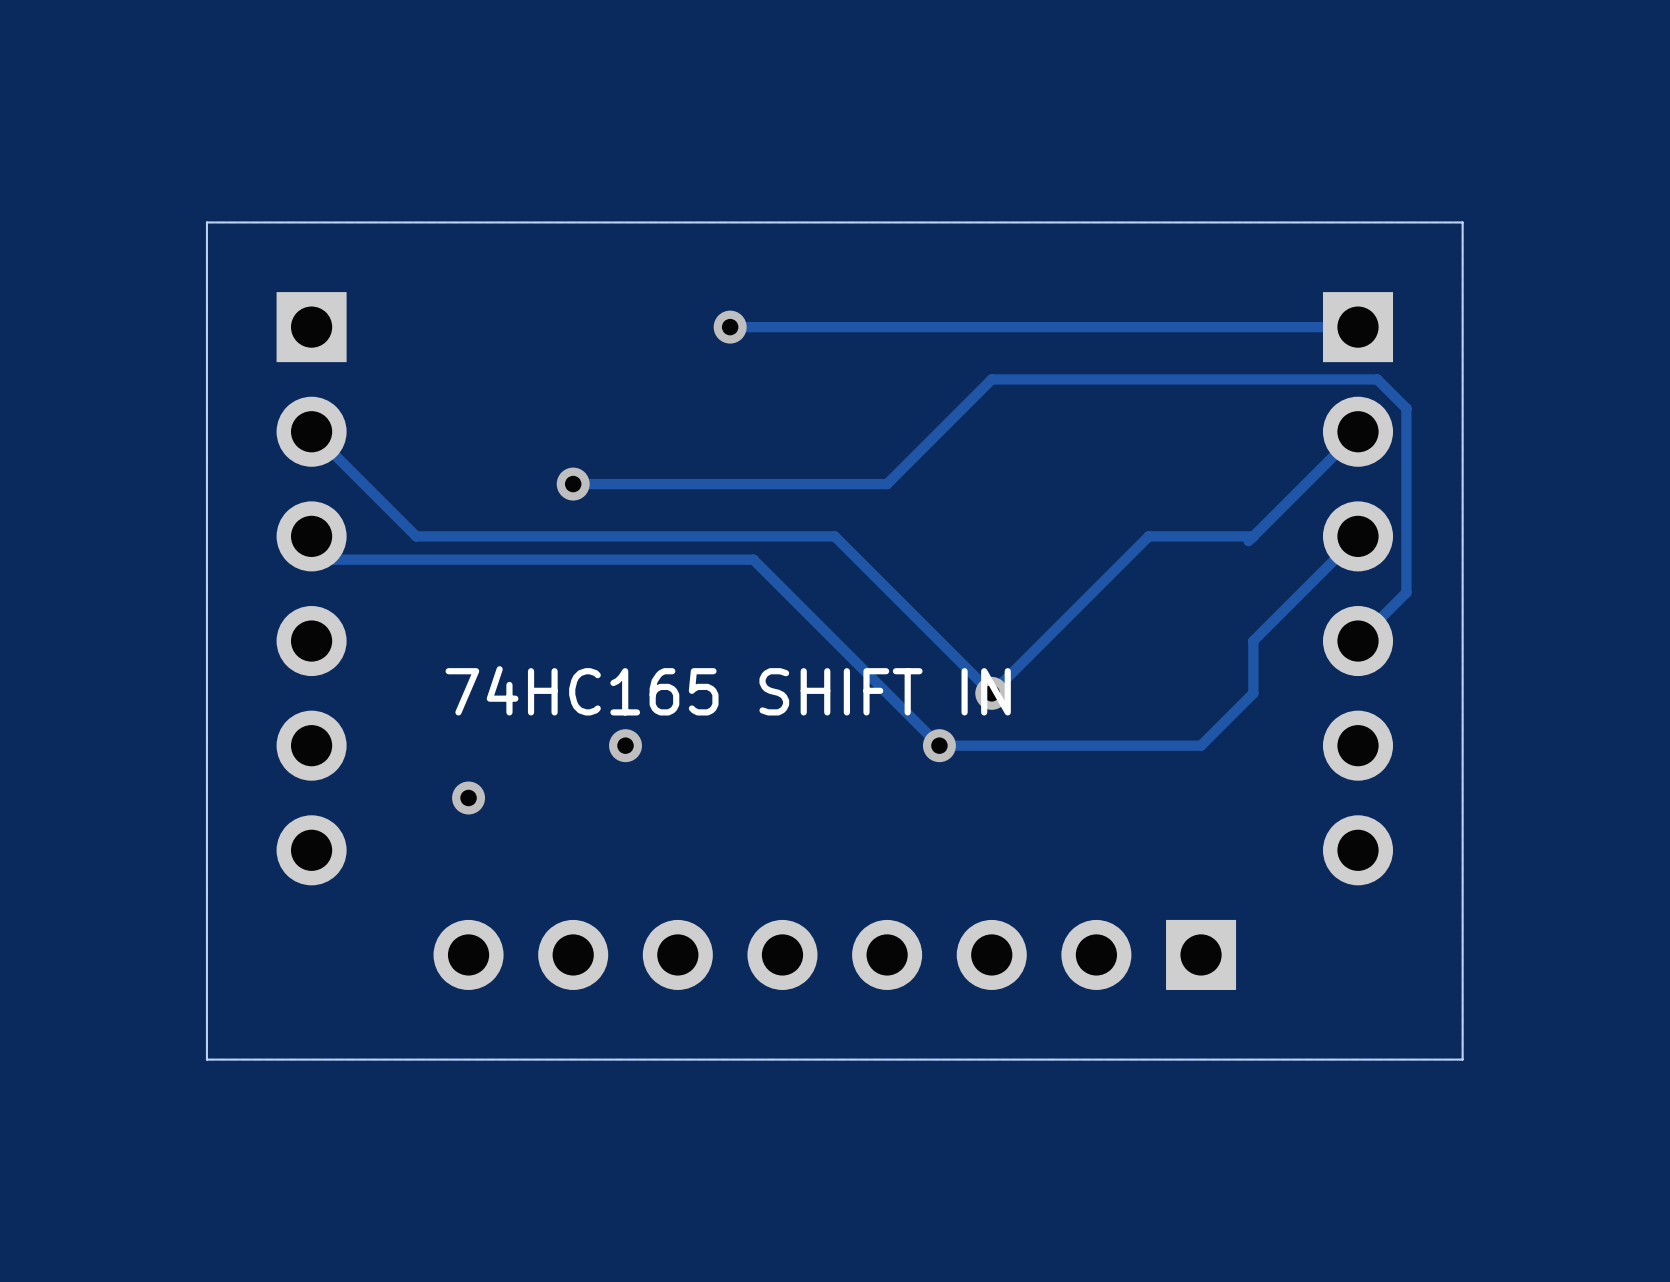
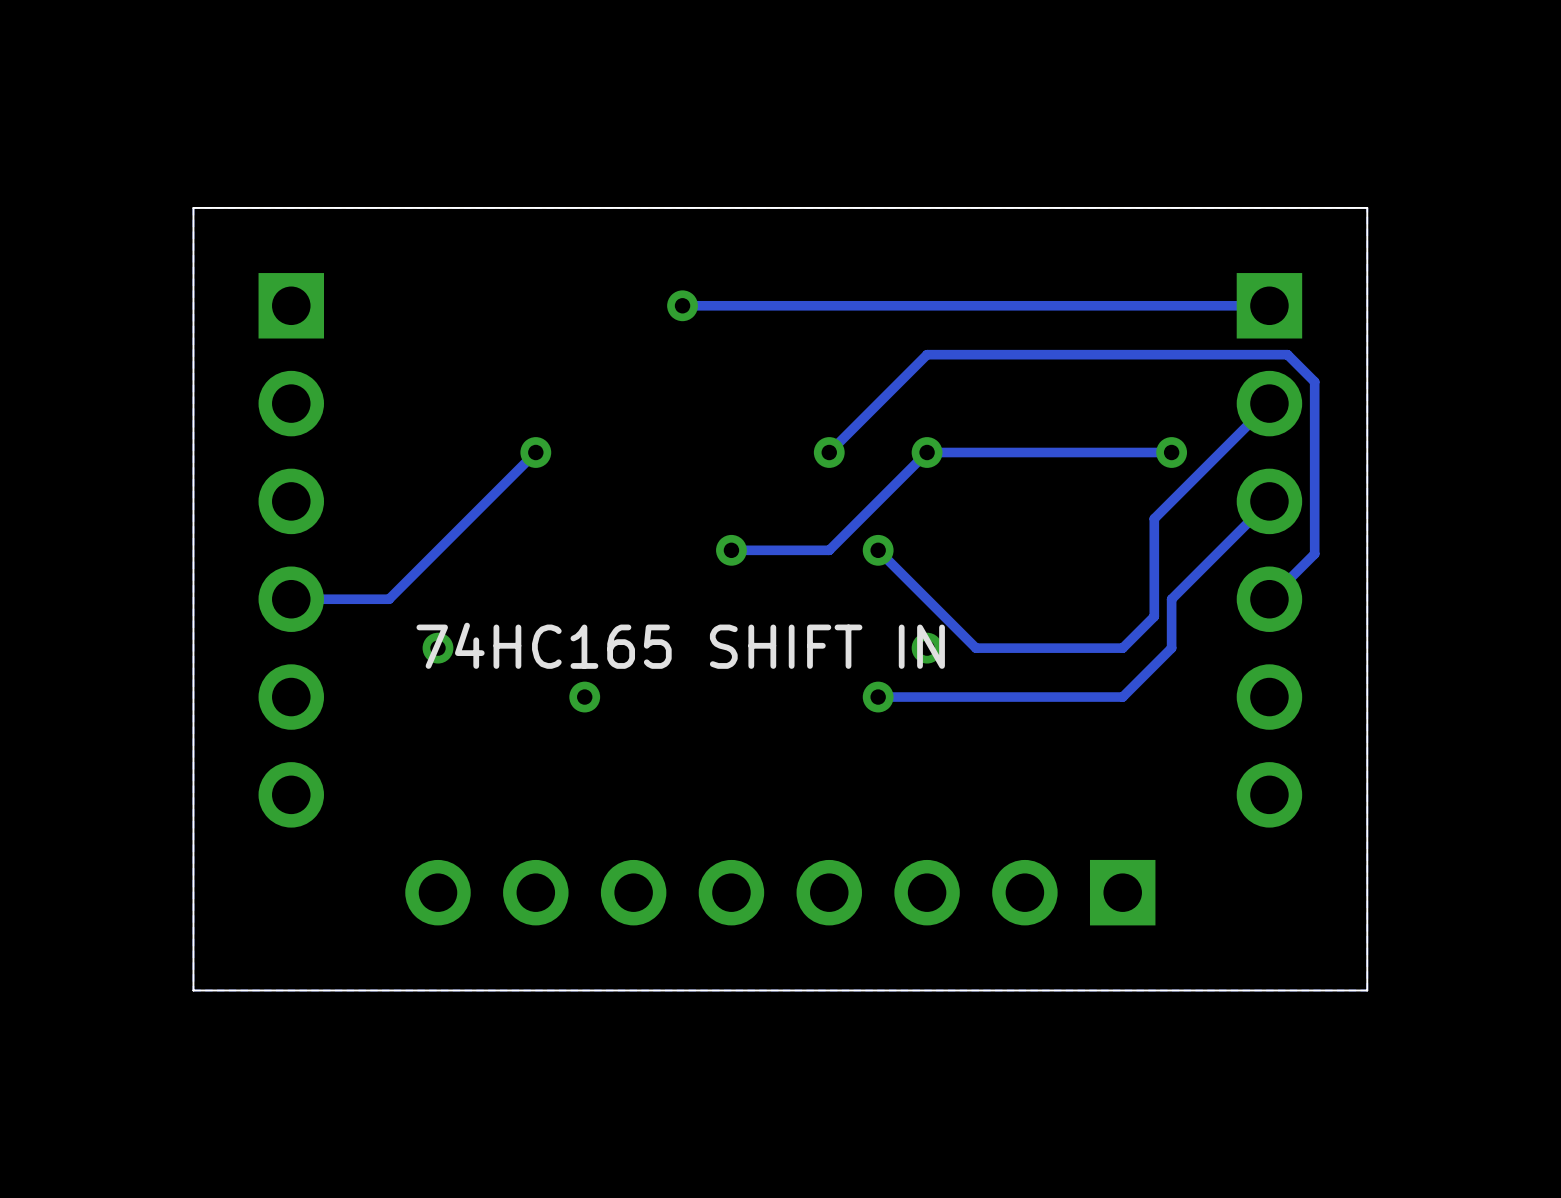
track: (311, 431) (416, 536) (834, 536) (991, 693) (1148, 536) (1253, 536) -> none
track: (887, 484) (573, 484) -> (291, 599) (389, 599) (535, 452)
via: none -> (829, 452)
via: none -> (927, 452)
track: none -> (1171, 452) (927, 452) (829, 550) (731, 550)
via: none -> (1171, 452)
track: (311, 536) (334, 559) (753, 559) (939, 745) -> none
track: none -> (1167, 505) (1154, 518) (1154, 616) (1122, 648) (975, 648) (878, 550)
via: none -> (731, 550)
via: none -> (878, 550)
via position: (468, 797) -> (437, 648)

